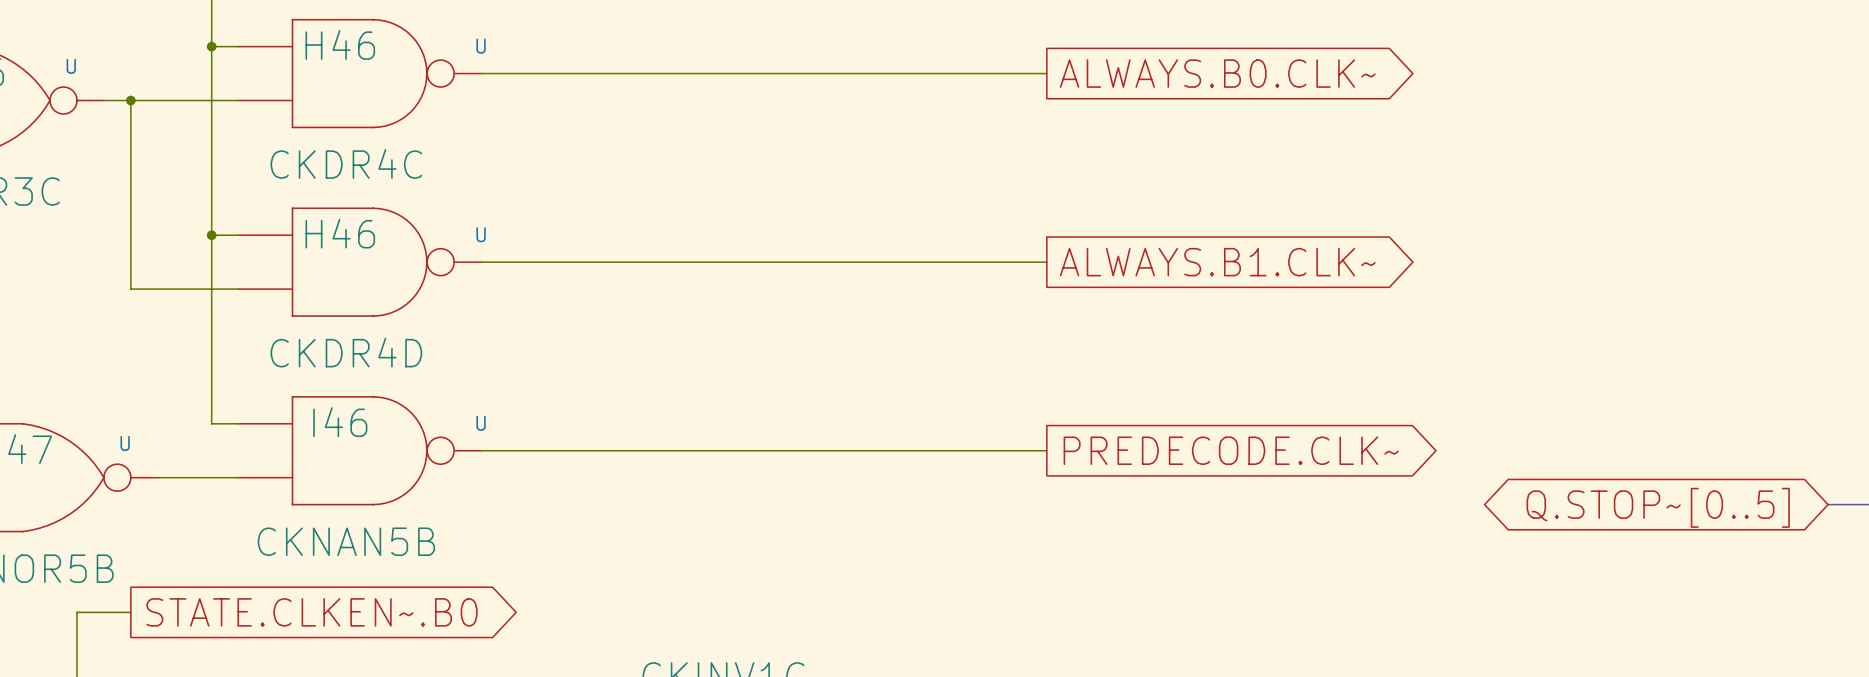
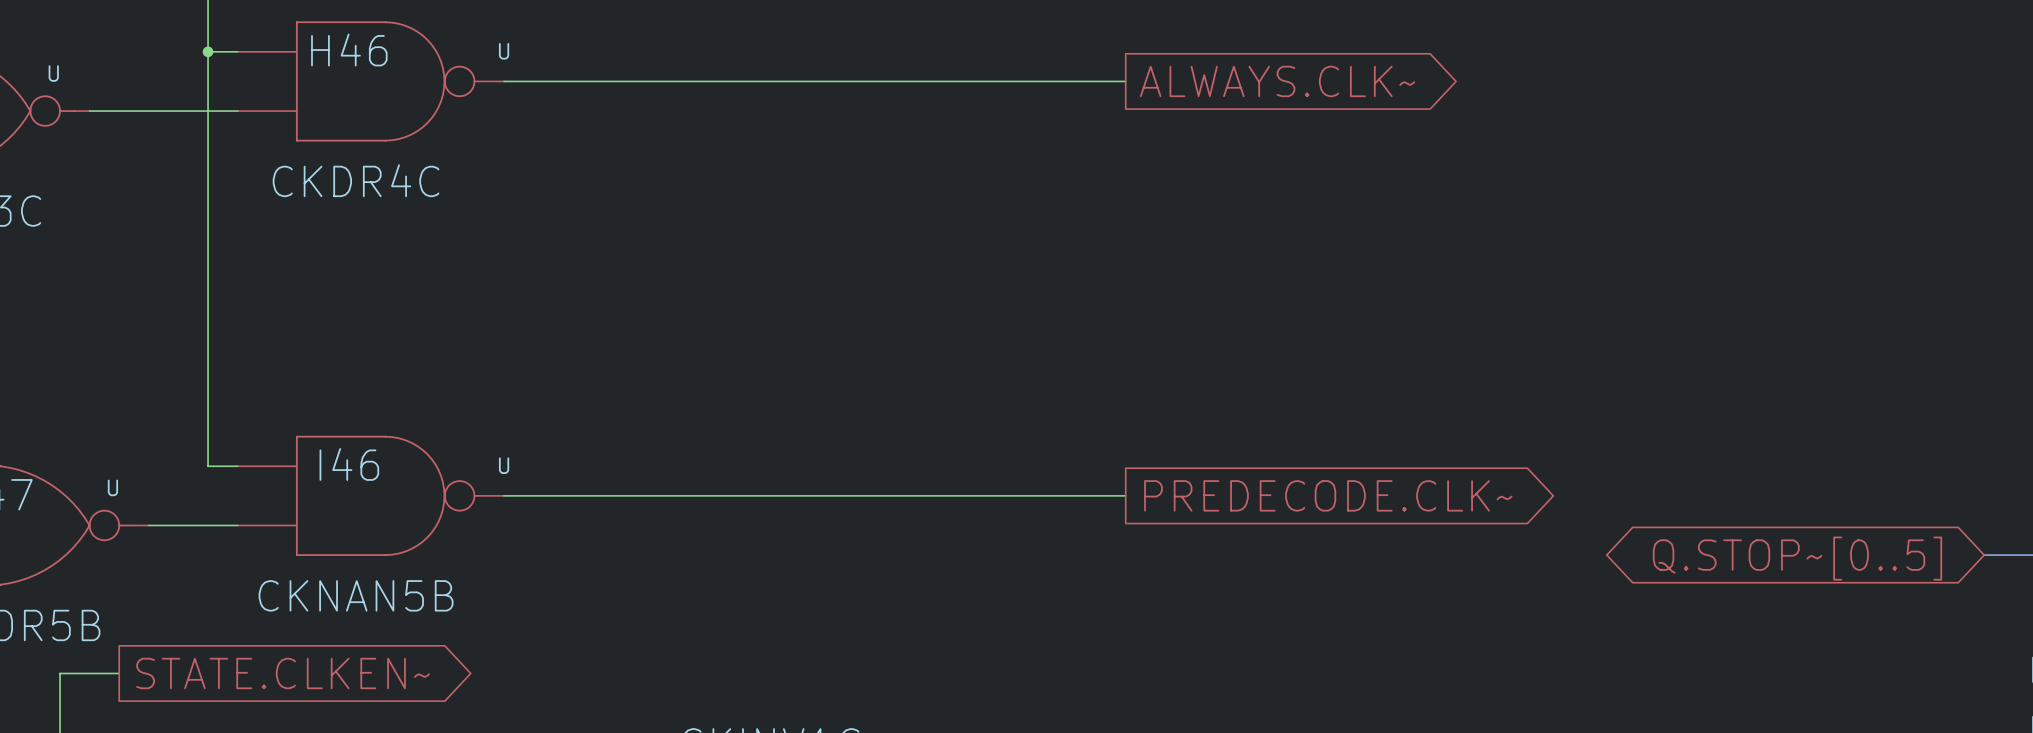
global label: ALWAYS.B0.CLK~ (1217, 73) -> ALWAYS.CLK~ (1277, 81)
wire: (130, 100) (130, 289) (238, 289) -> none
junction: (130, 100) -> none
wire: (211, 235) (238, 235) -> none
junction: (211, 235) -> none
U: (359, 262) -> none
wire: (481, 262) (1046, 262) -> none
global label: ALWAYS.B1.CLK~ (1217, 262) -> none
global label: STATE.CLKEN~.B0 (312, 612) -> STATE.CLKEN~ (283, 673)

